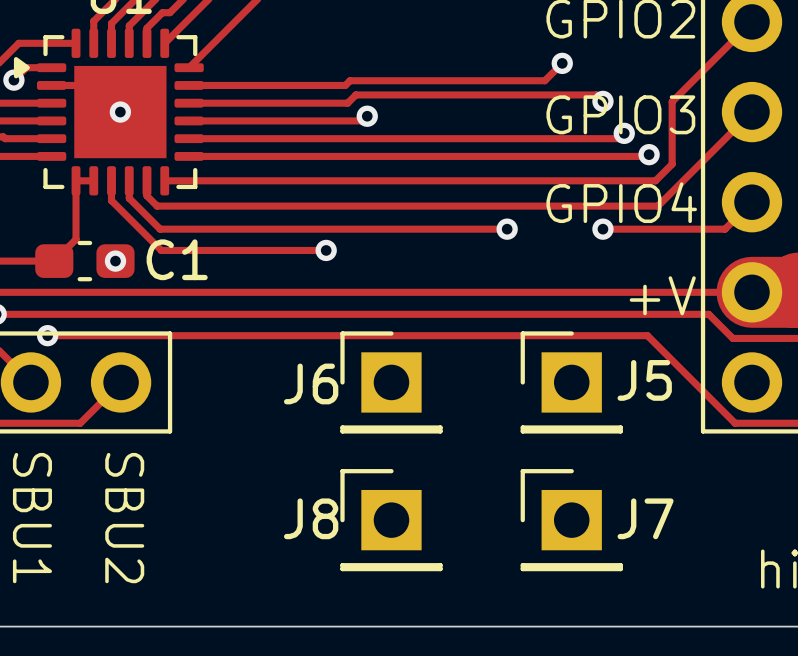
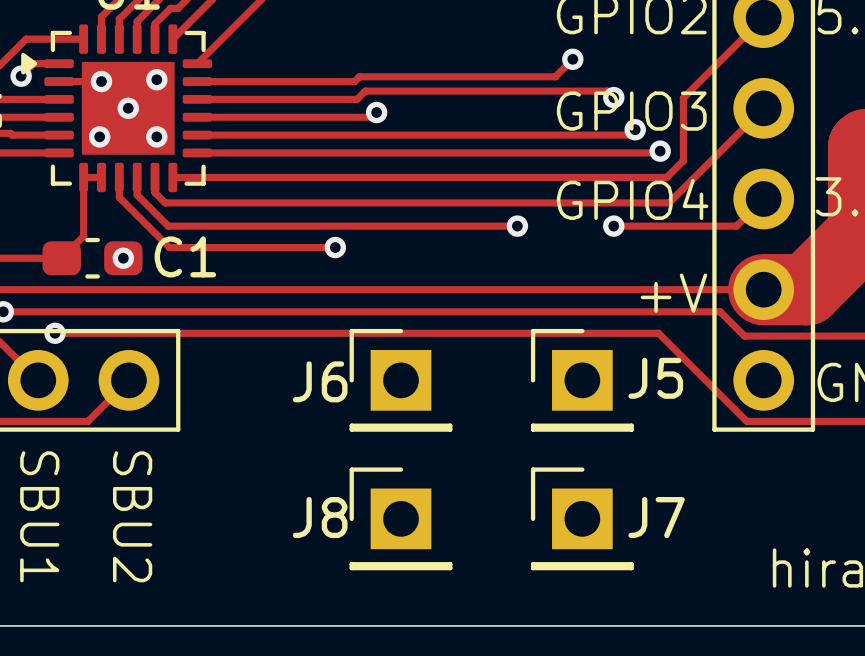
via: none -> (156, 79)
via: none -> (101, 81)
via: none -> (99, 136)
via: none -> (156, 136)

